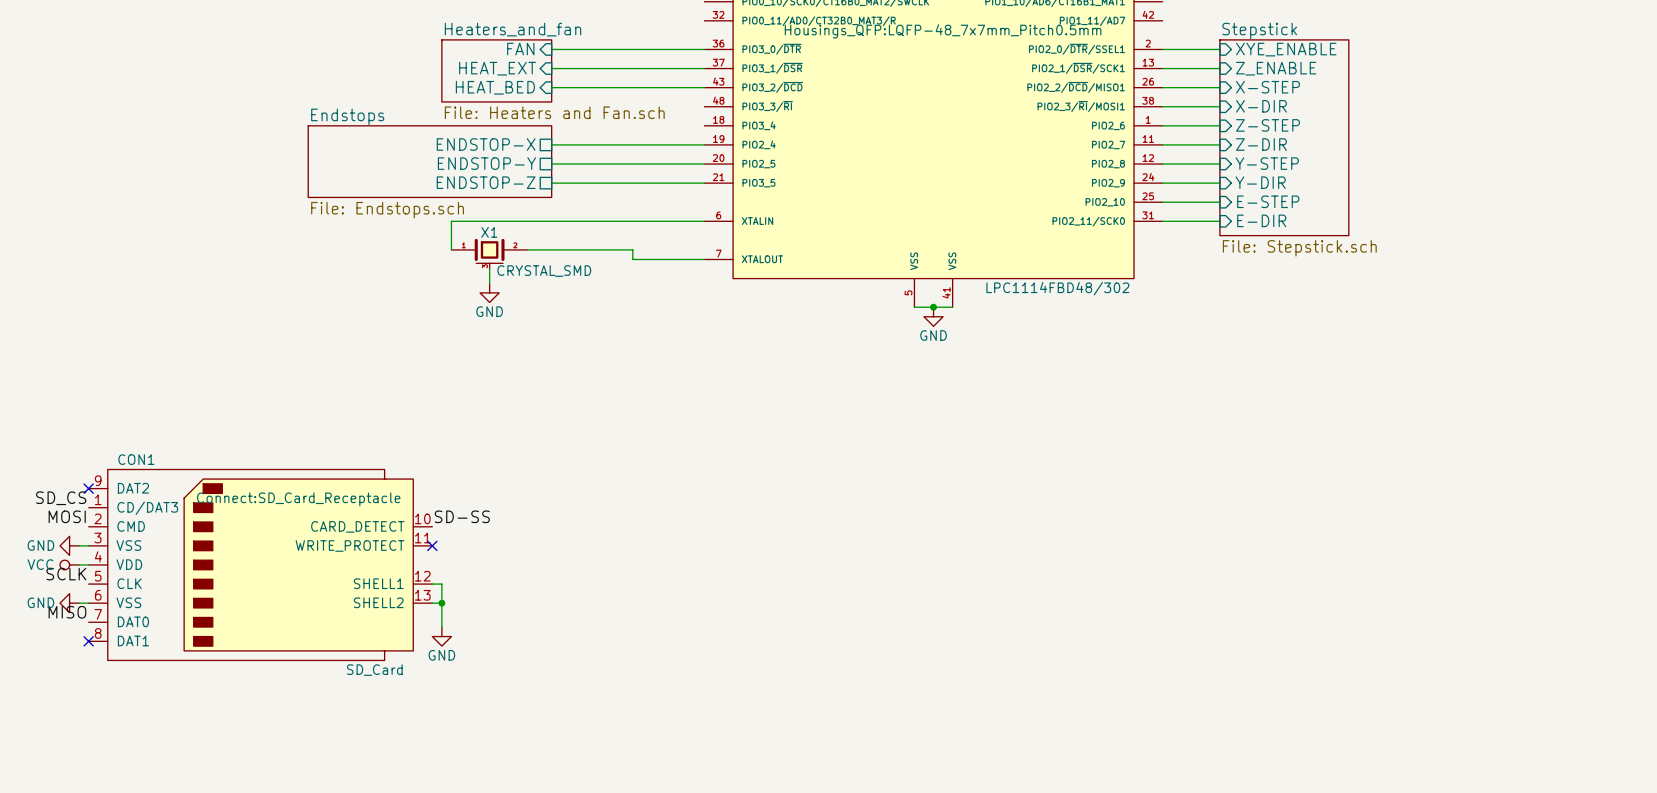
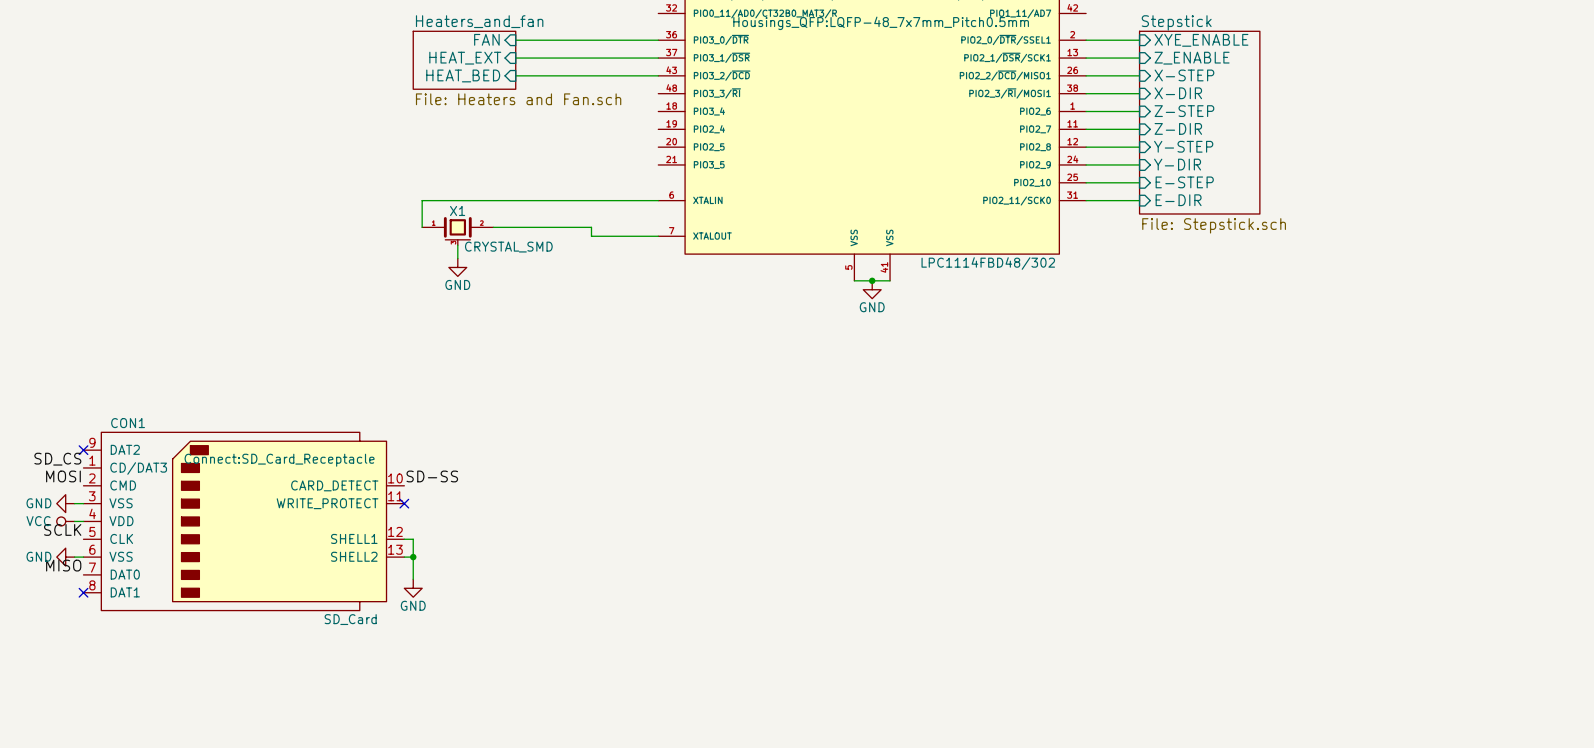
sheet pin: ENDSTOP-X (486, 144) -> none
wire: (551, 144) (704, 144) -> none
sheet Endstops: File: Endstops.sch (429, 161) -> none
sheet pin: ENDSTOP-Y (486, 163) -> none
wire: (551, 164) (704, 164) -> none
sheet pin: ENDSTOP-Z (486, 182) -> none
wire: (551, 183) (704, 183) -> none

